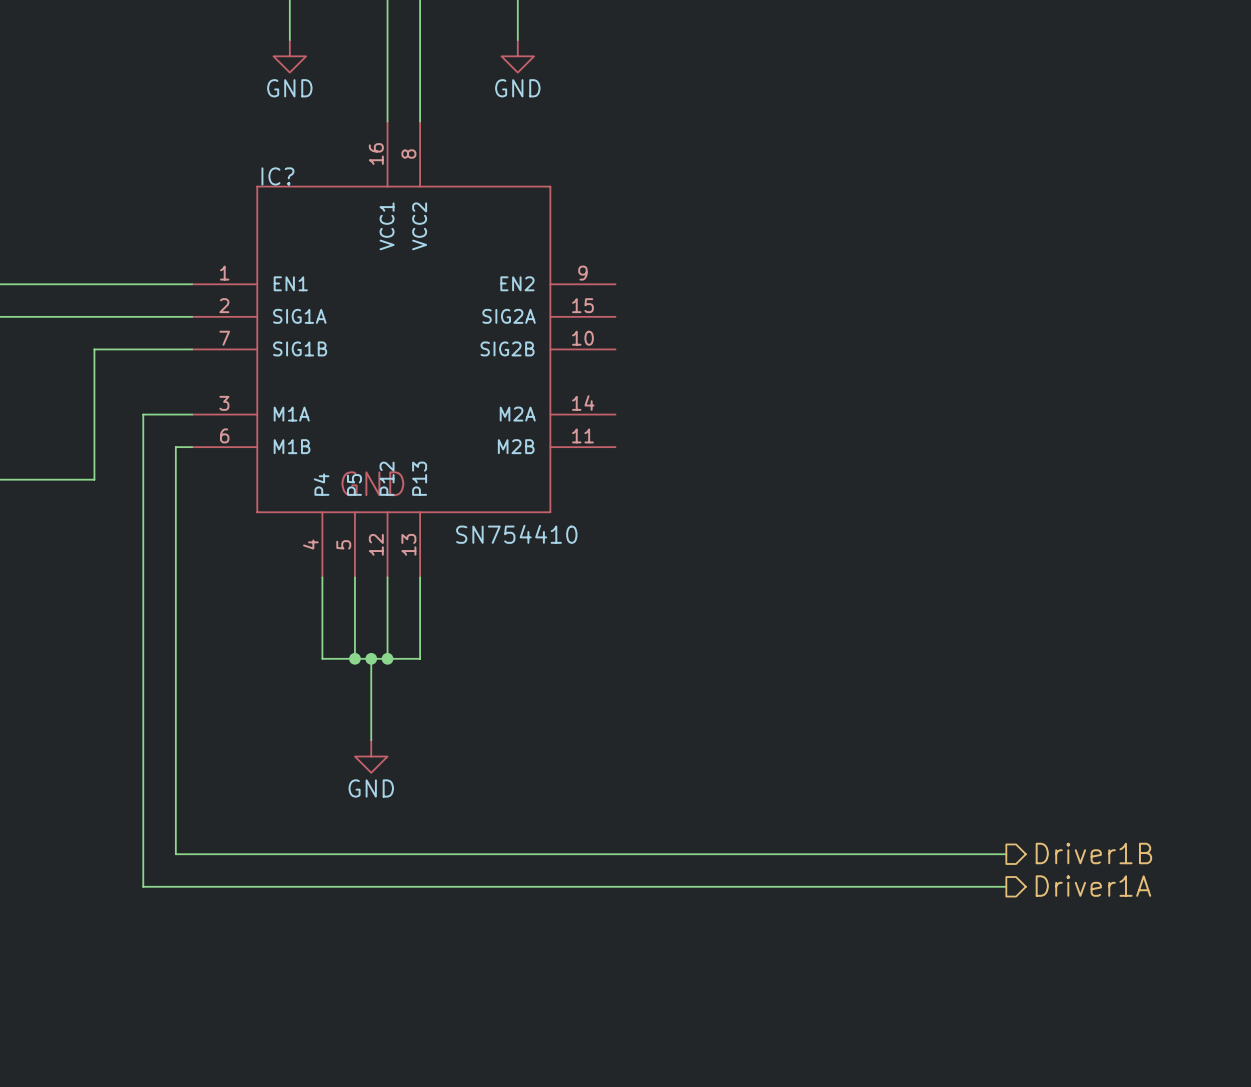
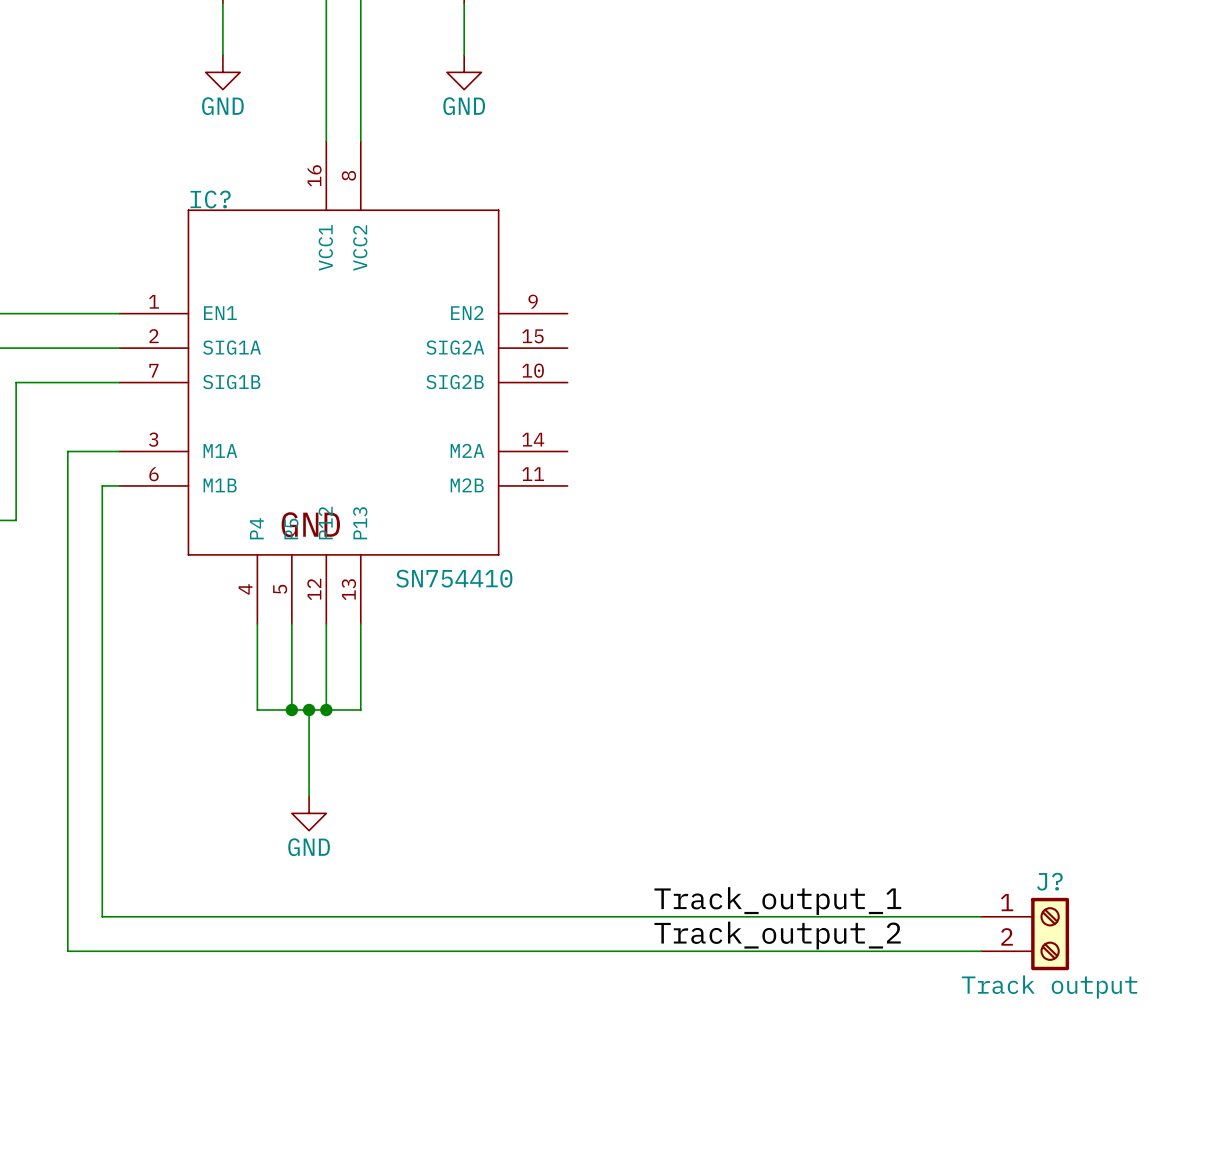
label: none -> Track_output_1 (777, 901)
hierarchical label: Driver1B (1093, 853) -> none
J?: none -> Track output (1025, 934)
label: none -> Track_output_2 (777, 935)
hierarchical label: Driver1A (1093, 886) -> none

